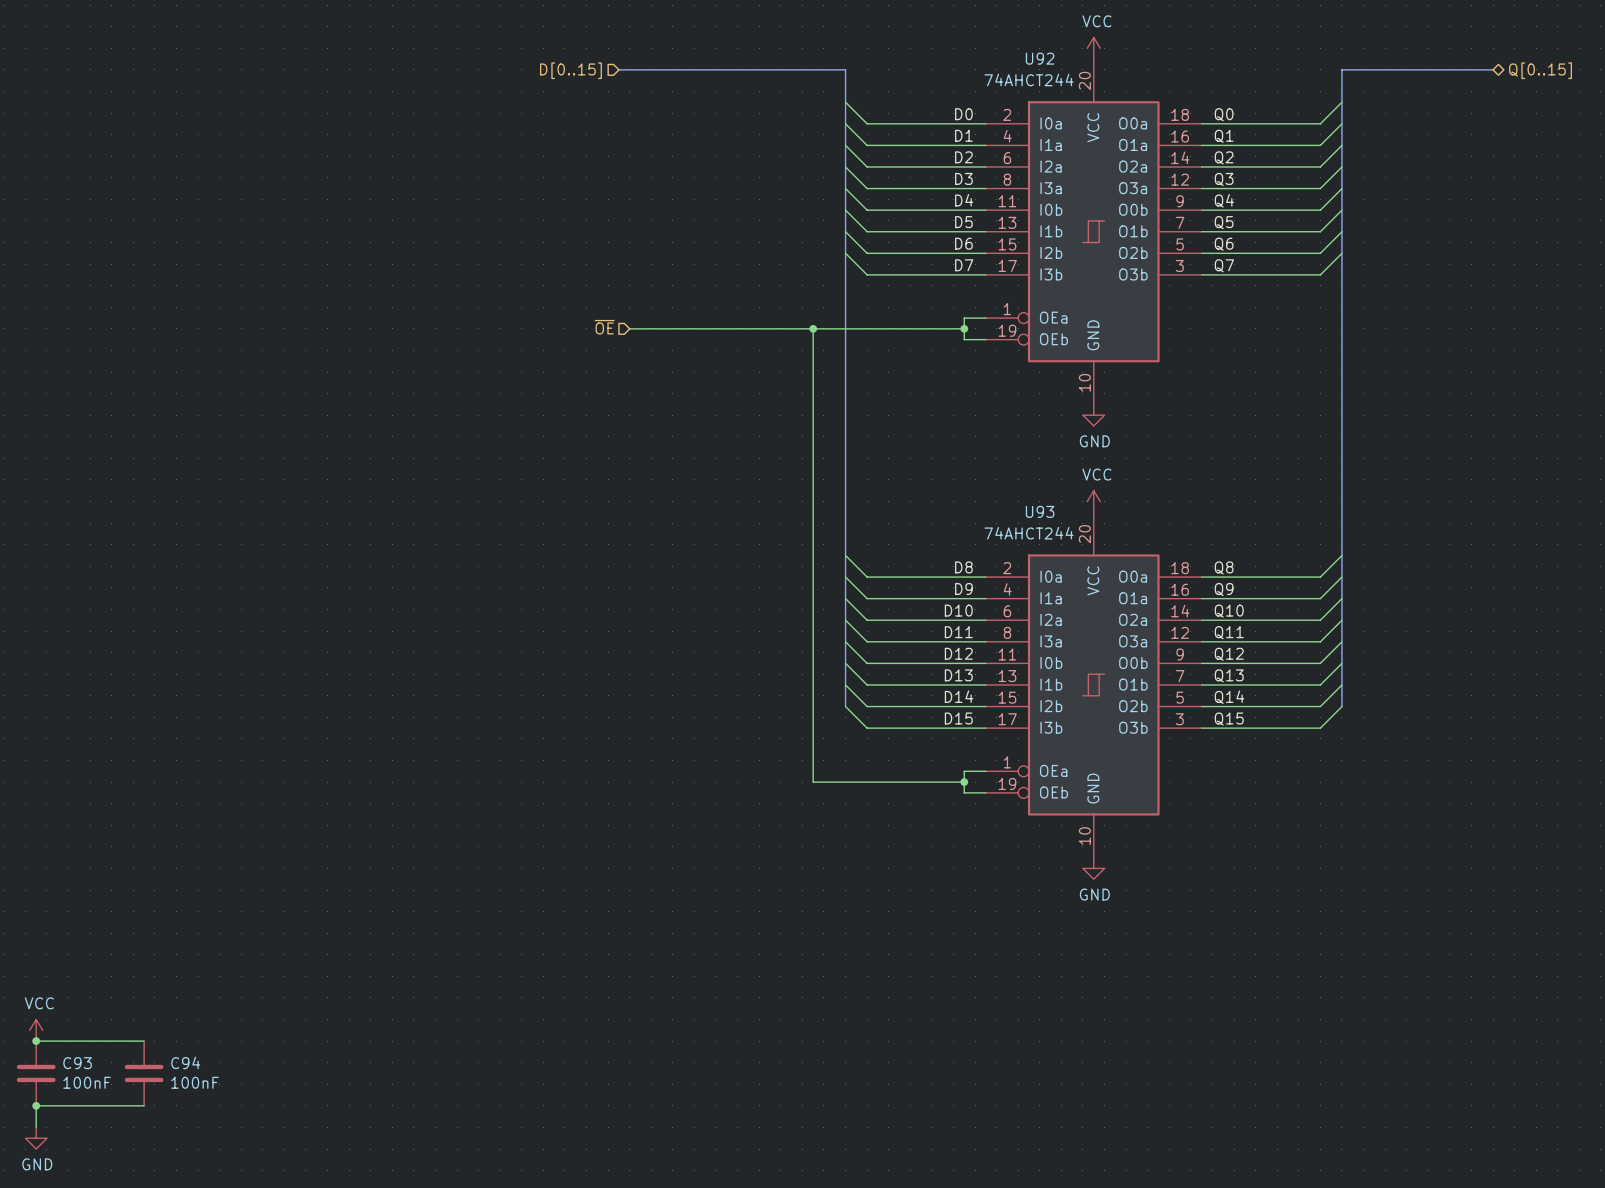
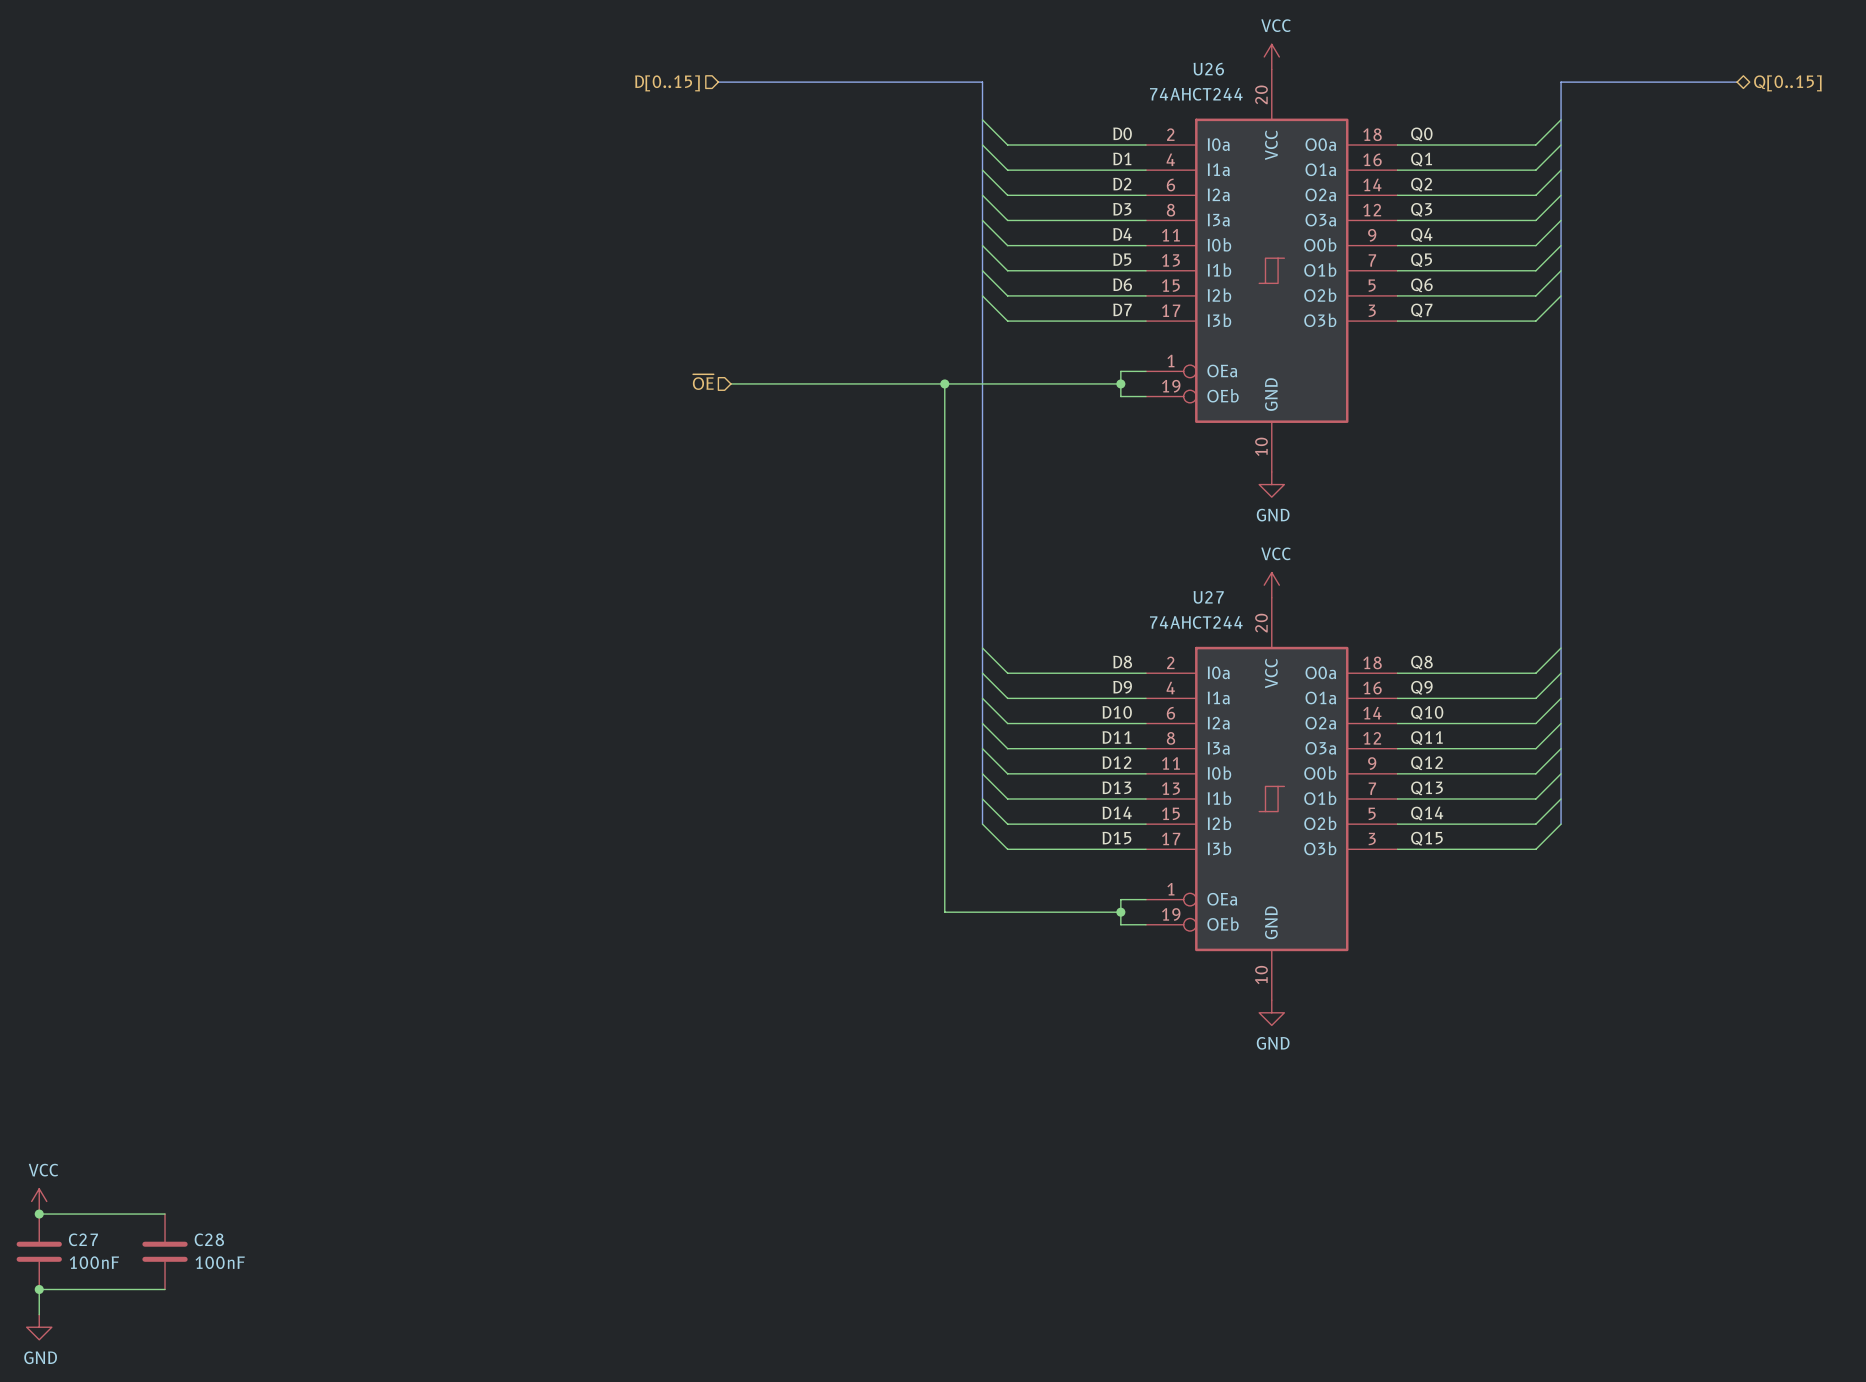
U92 name: U92 (1040, 58) -> U26 (1208, 69)
U93 name: U93 (1040, 511) -> U27 (1208, 597)
C94 name: C94 (185, 1062) -> C28 (209, 1239)
C93 name: C93 (77, 1063) -> C27 (83, 1239)

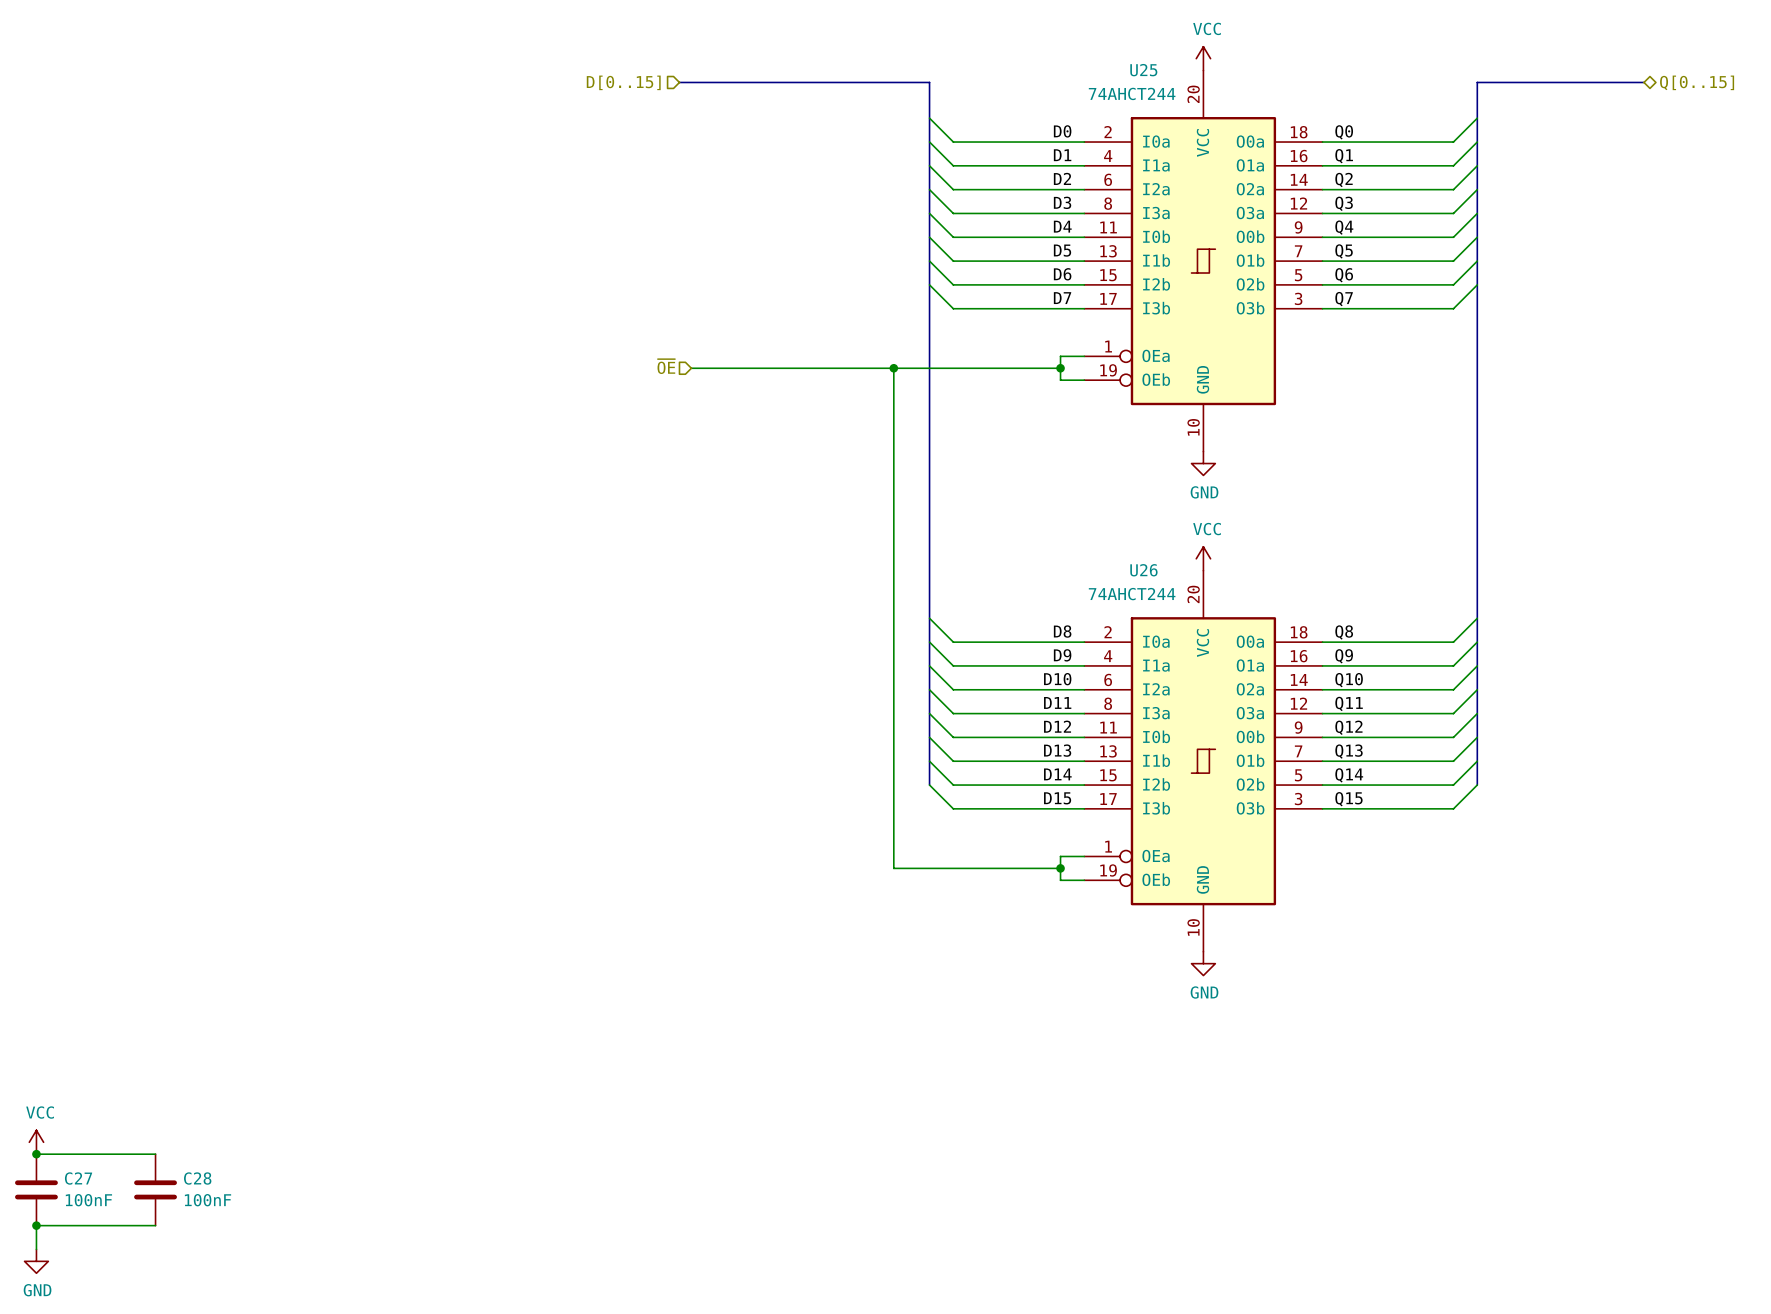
U26 name: U26 (1208, 69) -> U25 (1143, 70)
U27 name: U27 (1208, 597) -> U26 (1143, 570)

